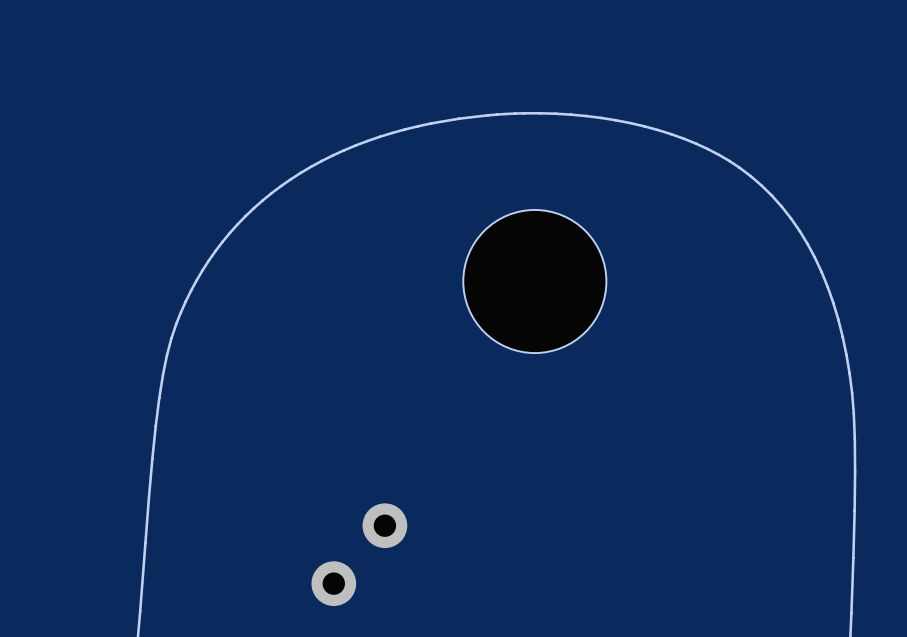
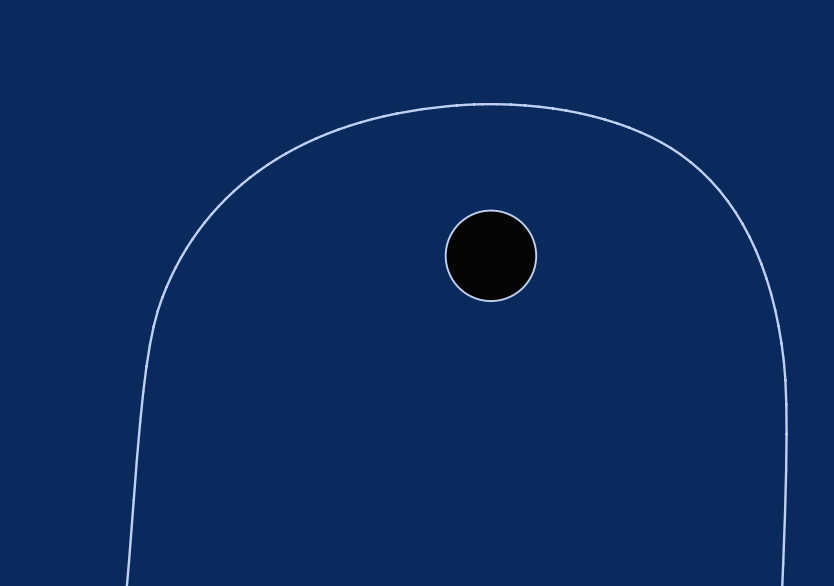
part footprint: [463, 209, 607, 354] -> [445, 210, 537, 302]
via: (384, 525) -> none
via: (333, 583) -> none

